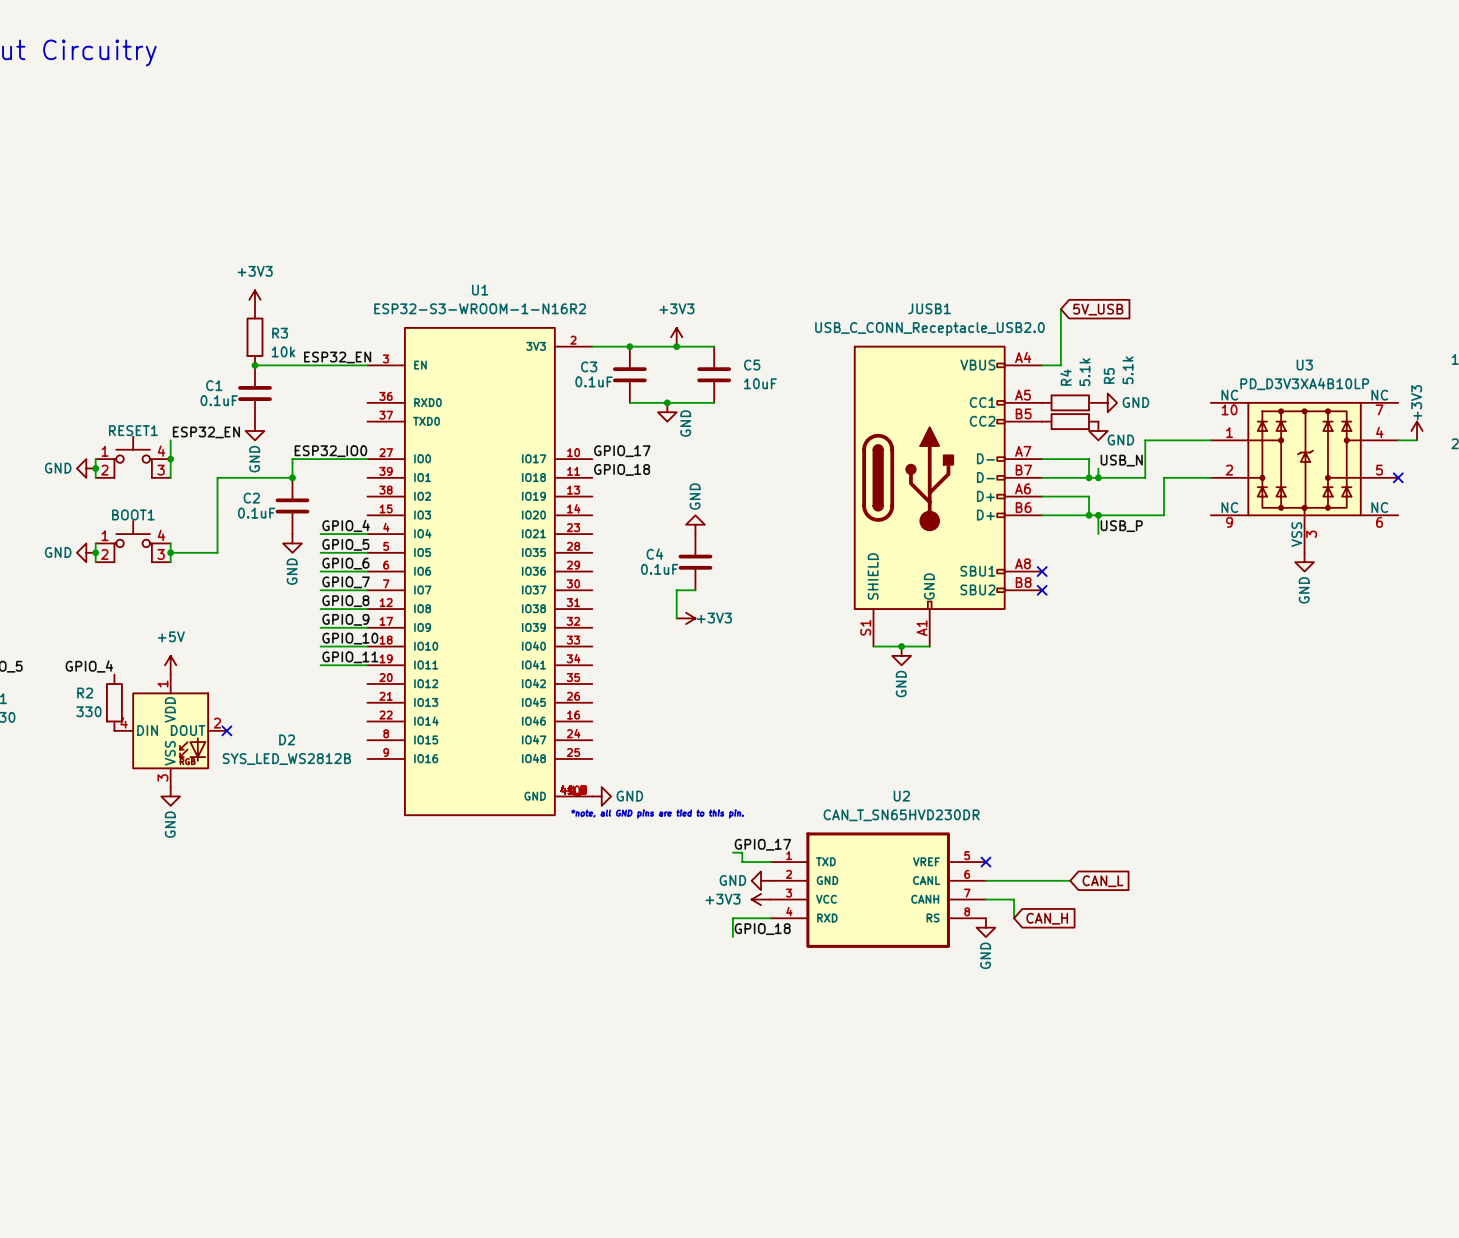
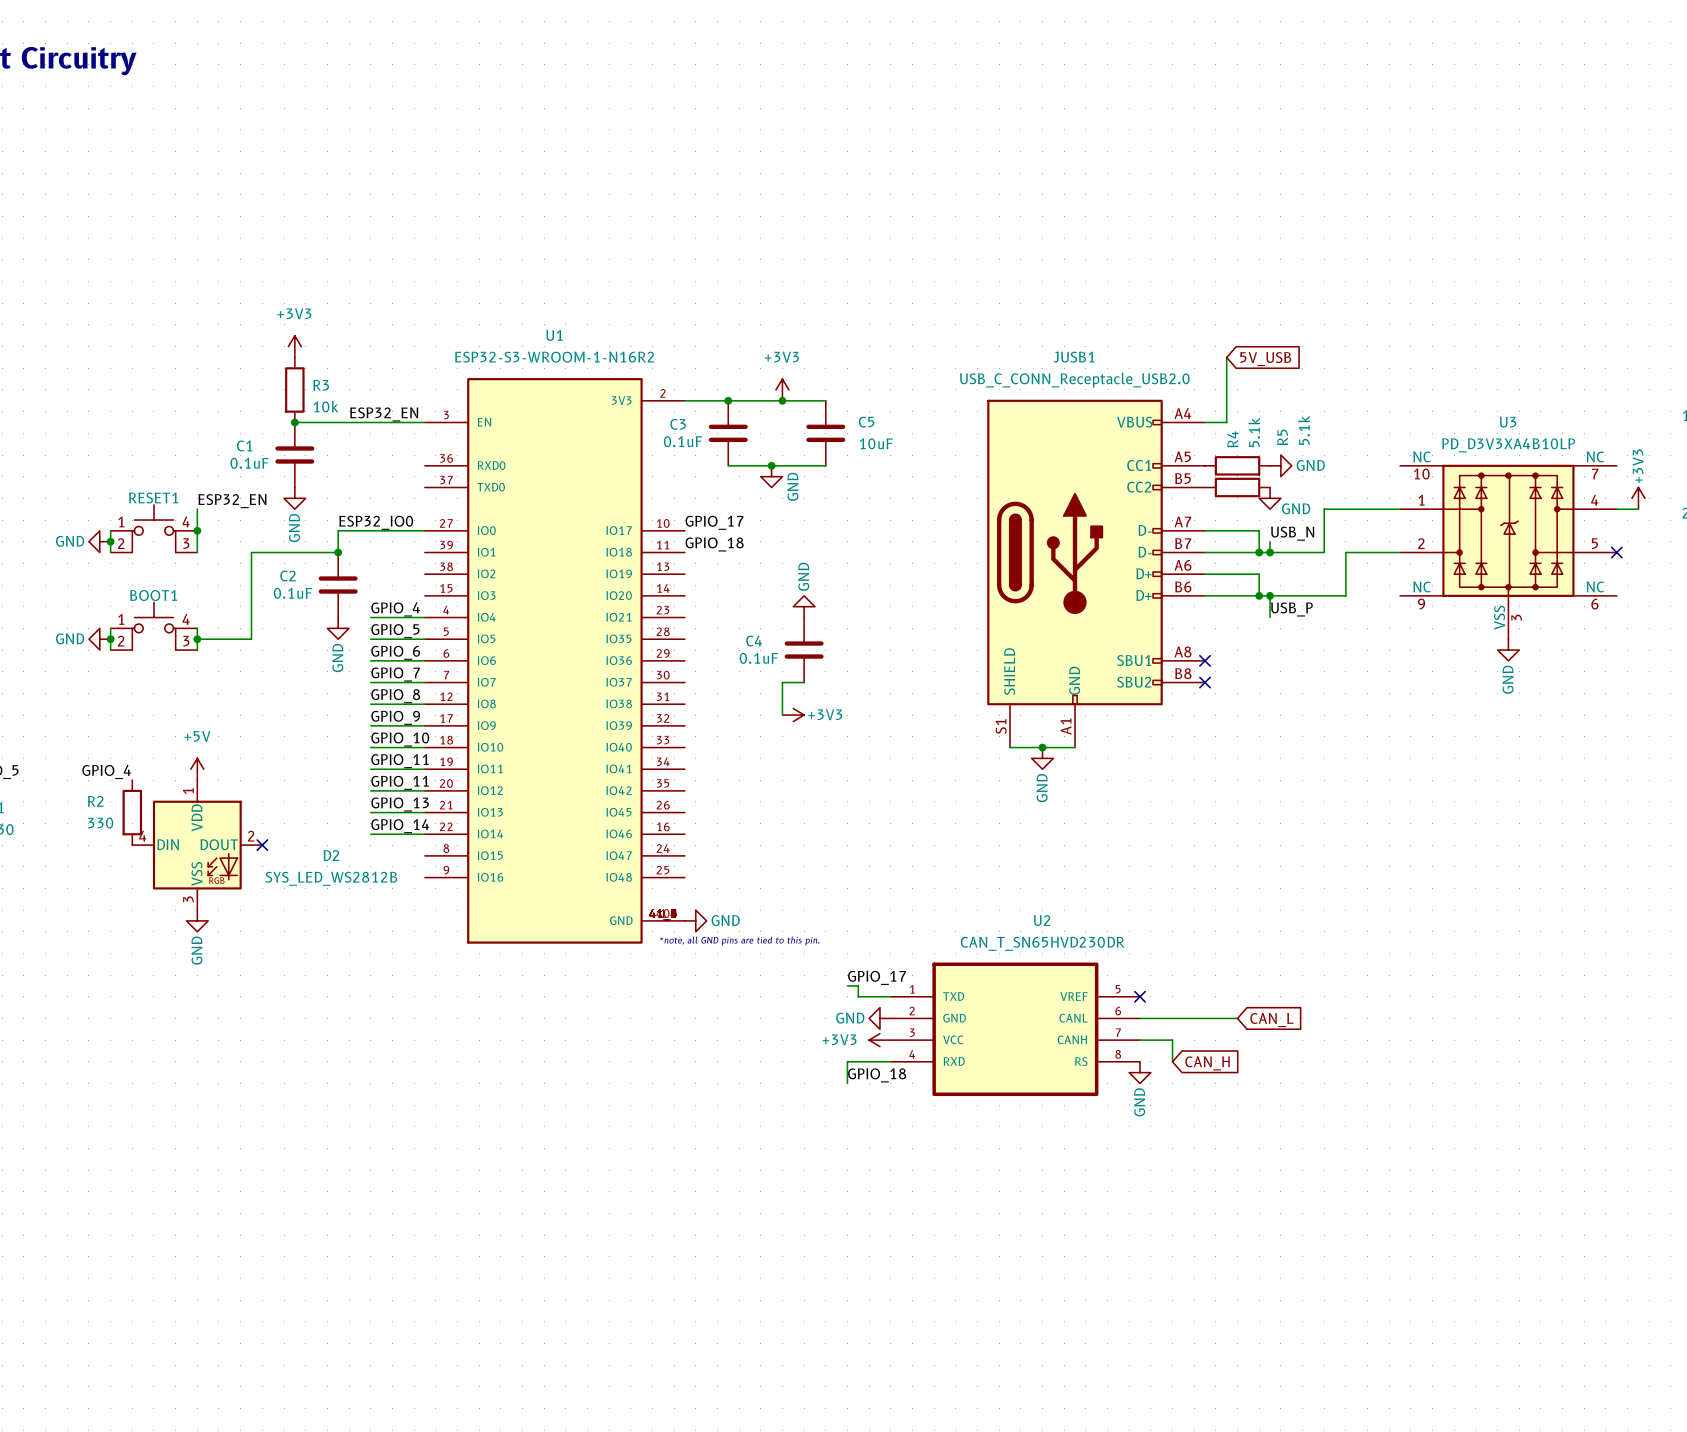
label: none -> GPIO_11 (400, 782)
wire: none -> (370, 790) (424, 790)
label: none -> GPIO_13 (400, 804)
wire: none -> (370, 812) (424, 812)
label: none -> GPIO_14 (400, 826)
wire: none -> (370, 834) (424, 834)

